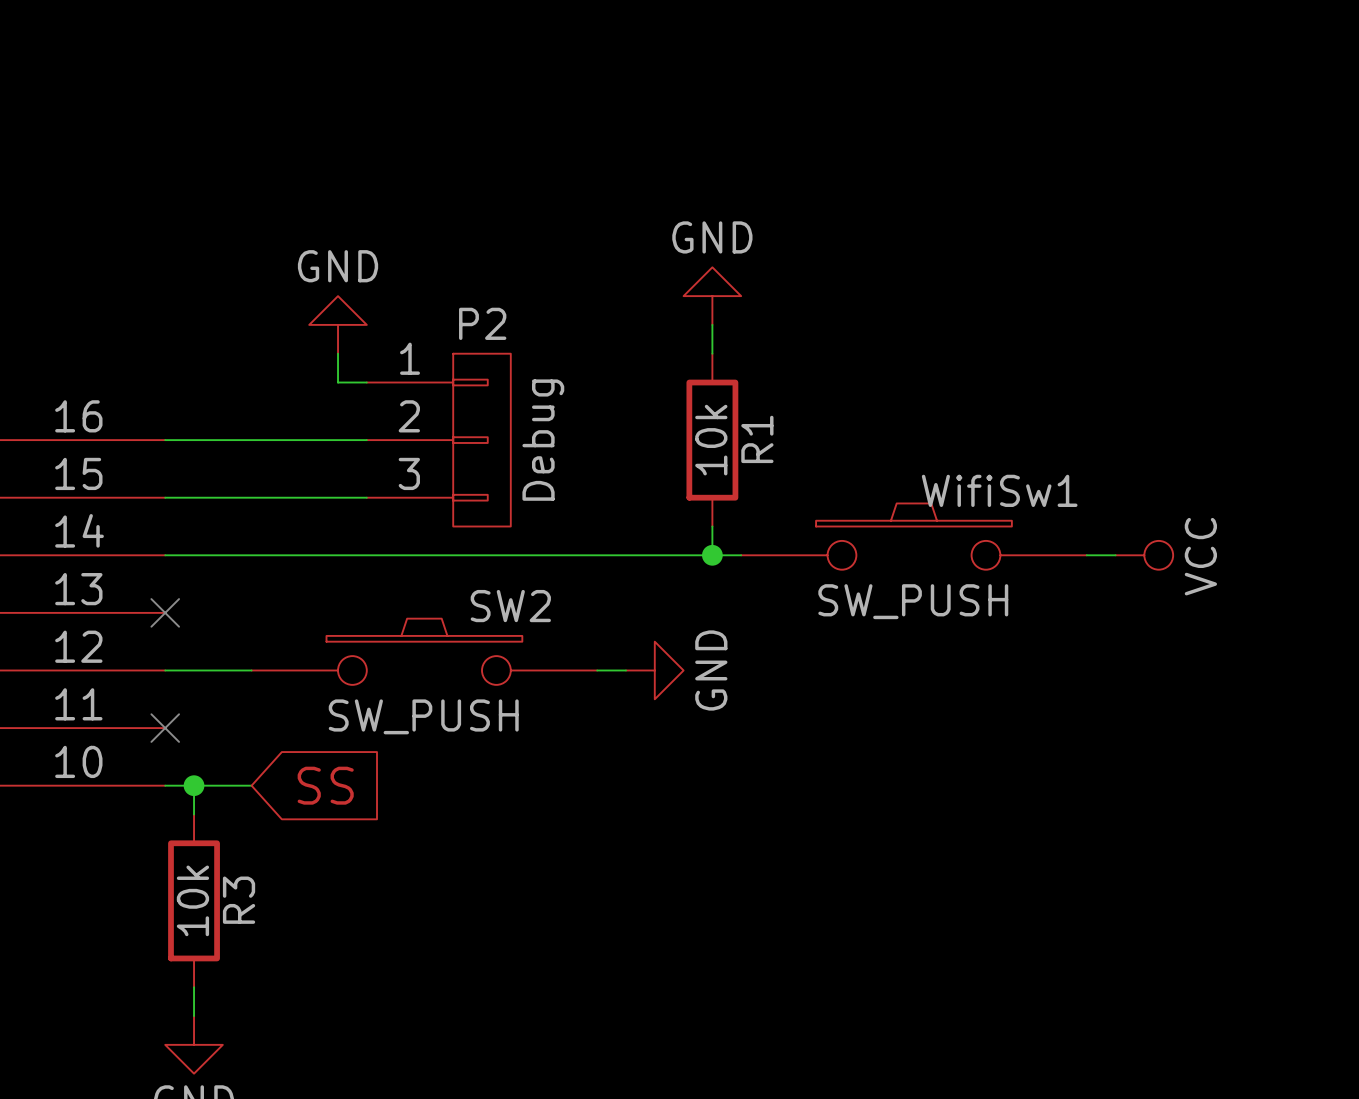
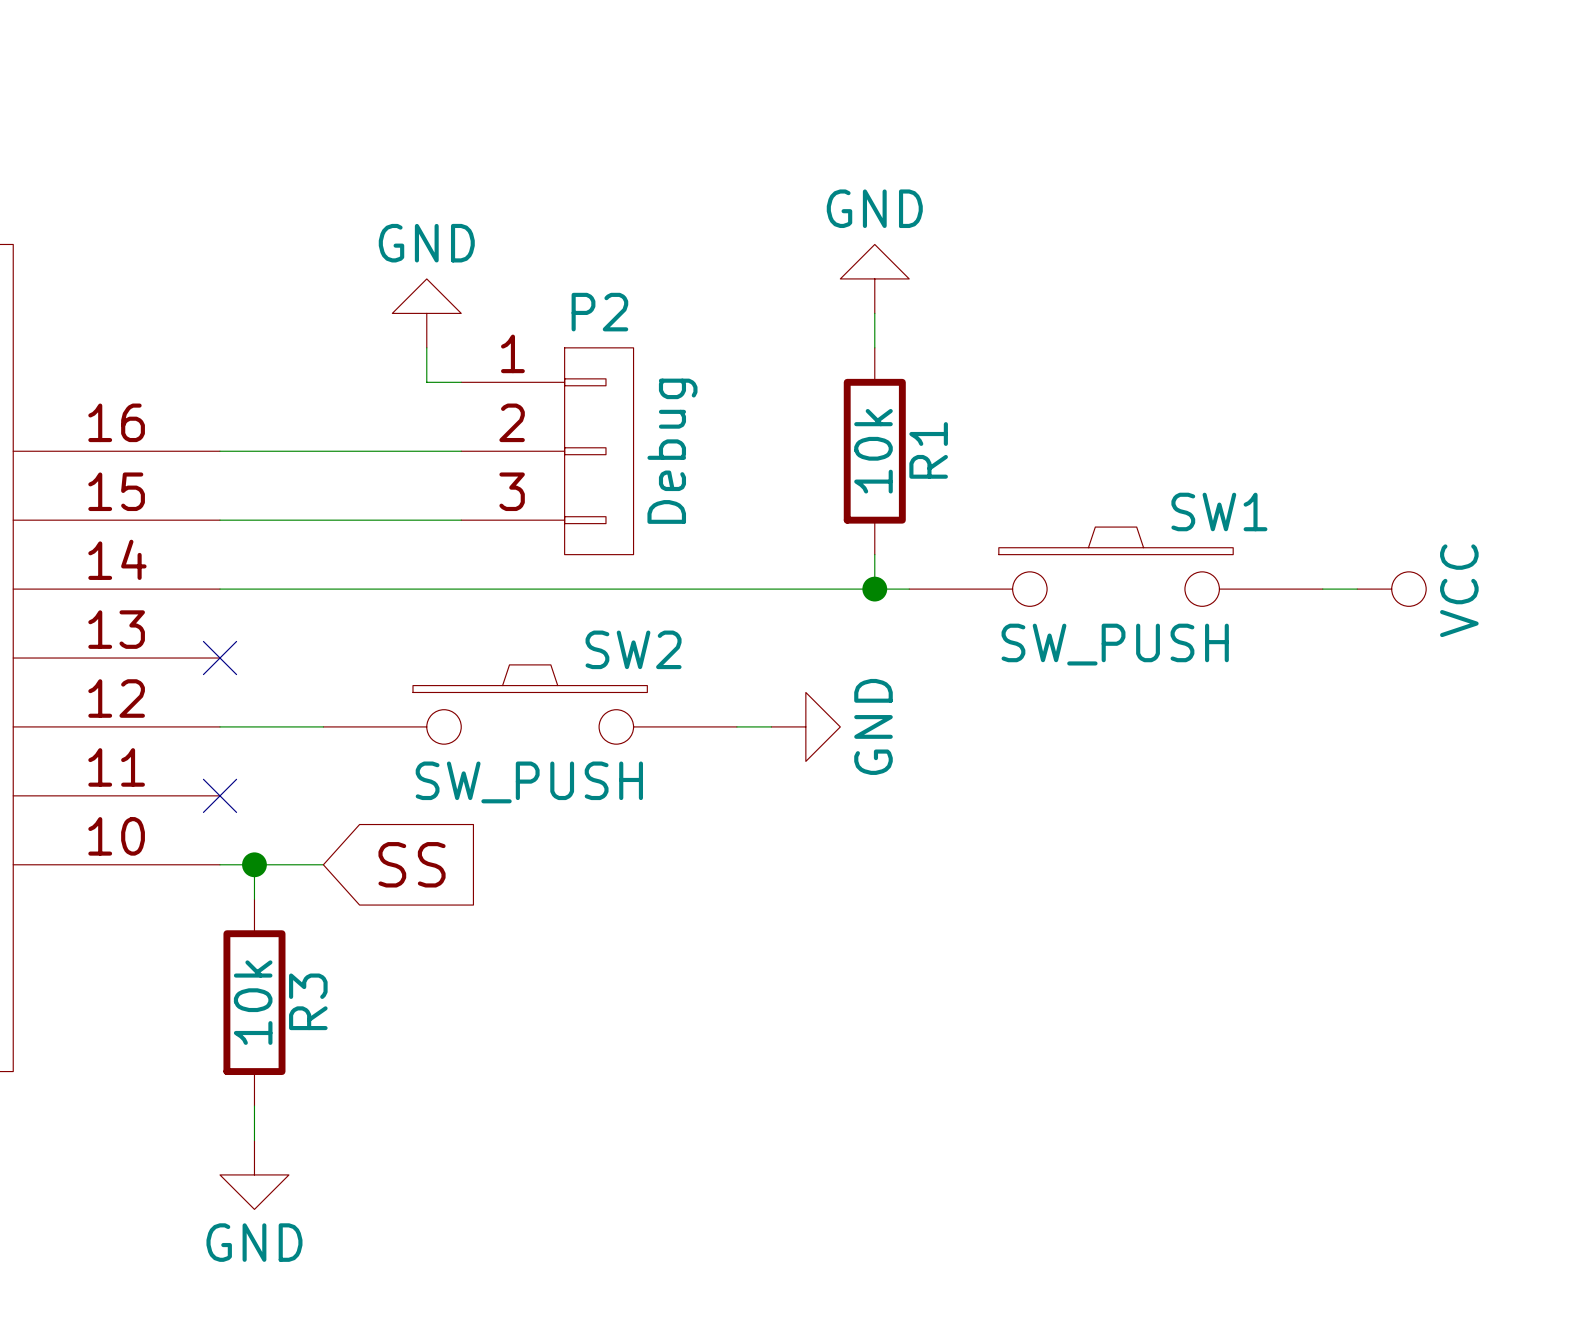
WifiSw1 name: WifiSw1 (999, 490) -> SW1 (1219, 511)

